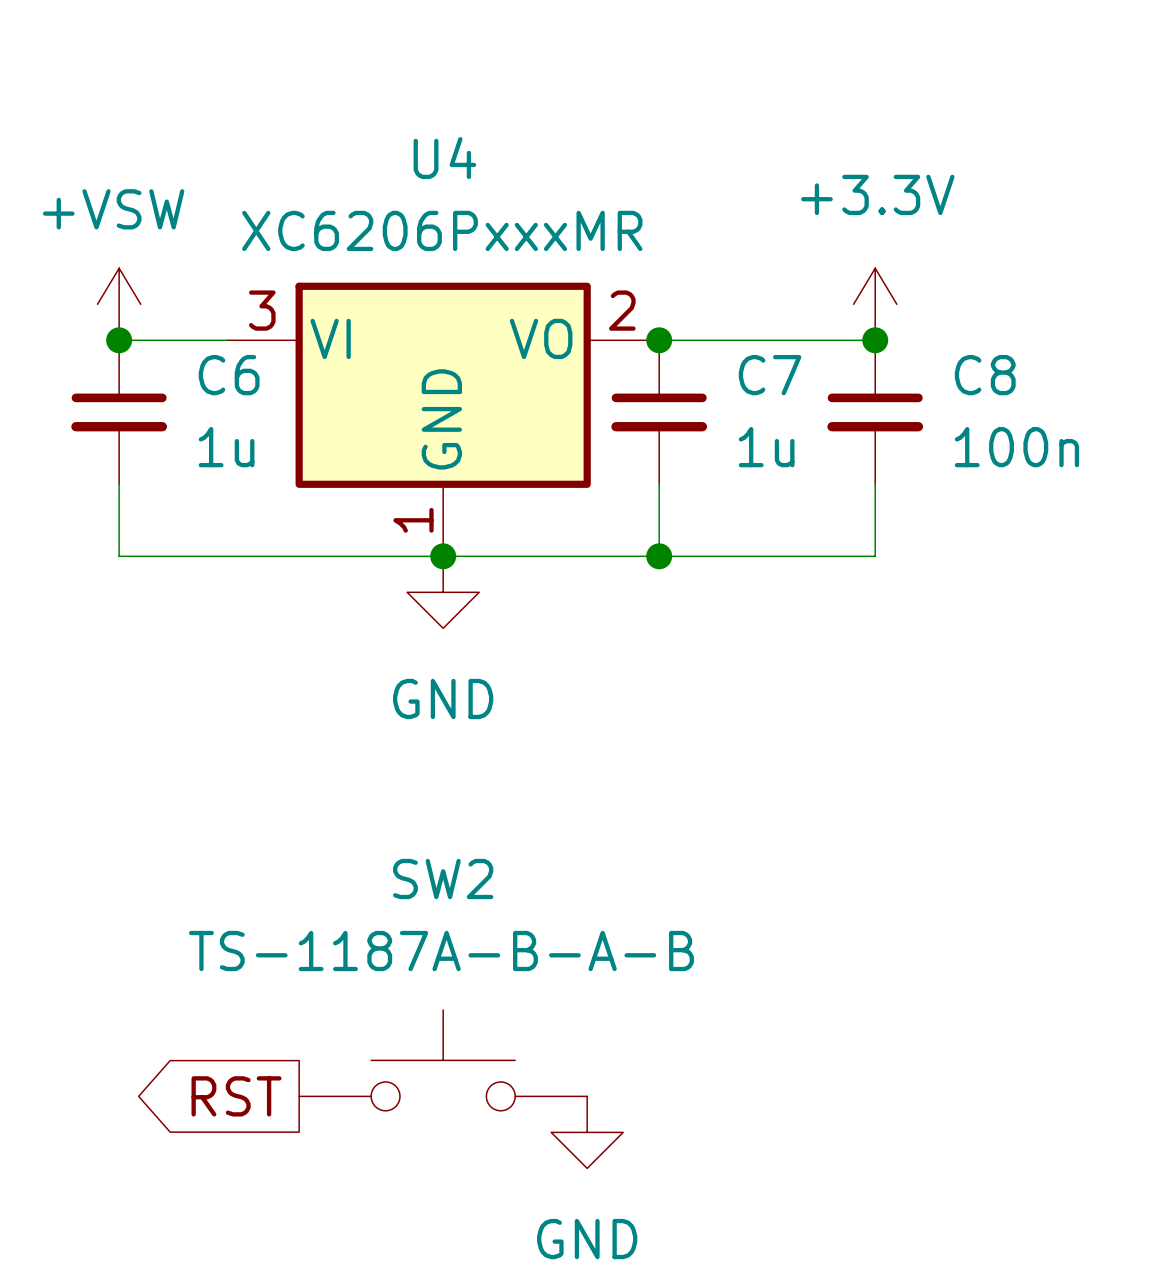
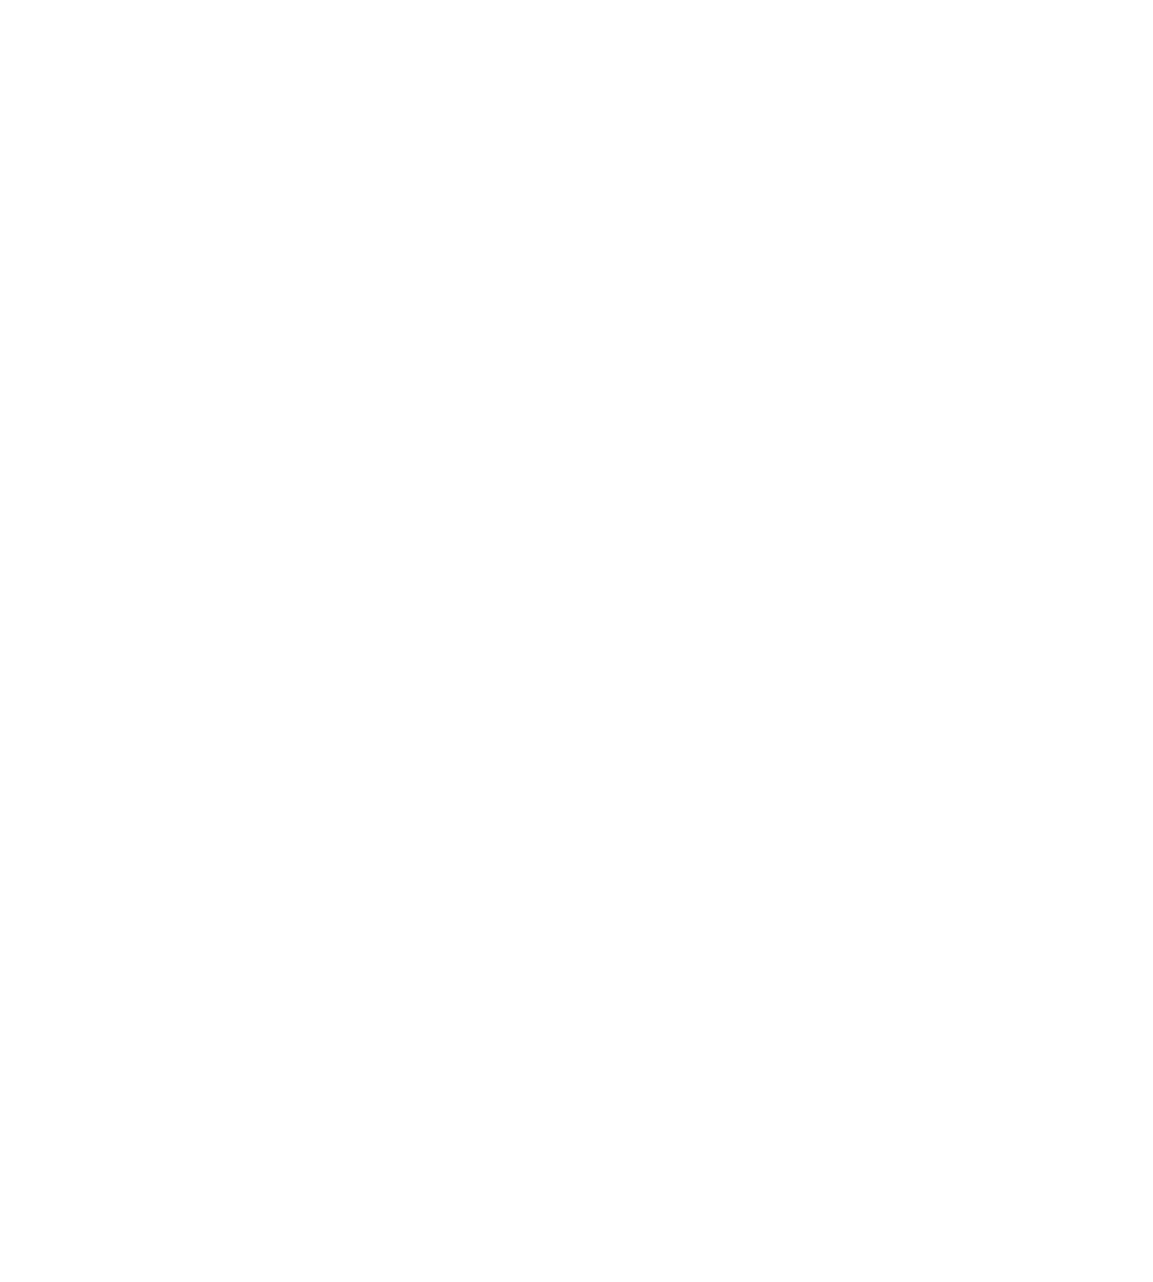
power symbol: +VSW (119, 304) -> none
power symbol: +3.3V (875, 304) -> none
wire: (119, 340) (227, 340) -> none
junction: (119, 340) -> none
wire: (659, 340) (875, 340) -> none
junction: (659, 340) -> none
junction: (875, 340) -> none
C6: 1u (119, 412) -> none
C7: 1u (659, 412) -> none
C8: 100n (875, 412) -> none
U4: XC6206PxxxMR (443, 419) -> none
wire: (119, 484) (119, 556) (875, 556) (875, 484) -> none
wire: (659, 484) (659, 556) -> none
junction: (443, 556) -> none
junction: (659, 556) -> none
power symbol: GND (443, 592) -> none
SW2: TS-1187A-B-A-B (443, 1060) -> none
global label: RST (236, 1096) -> none
power symbol: GND (587, 1132) -> none

